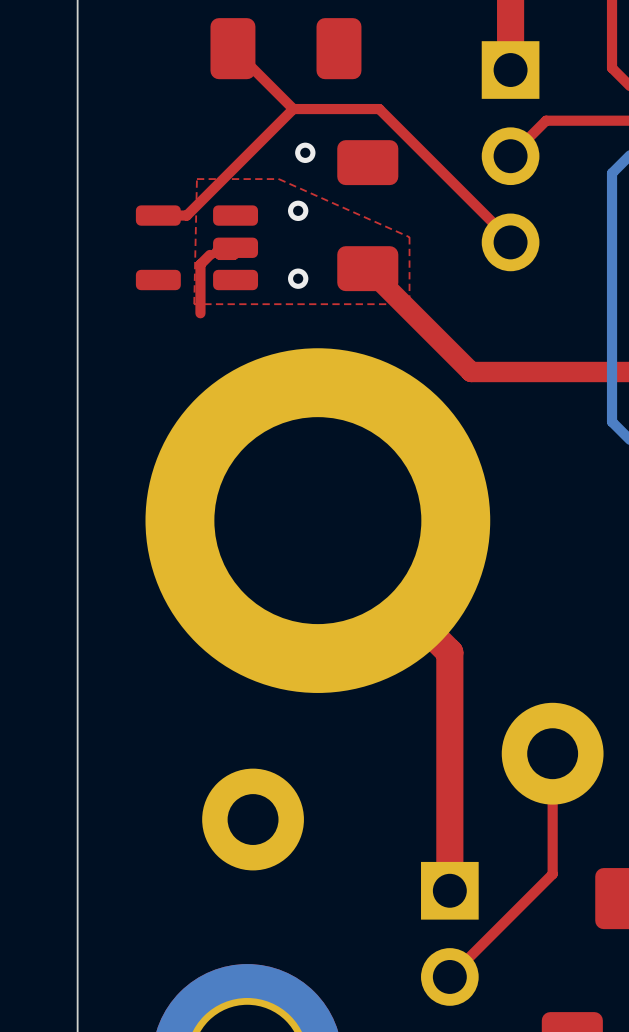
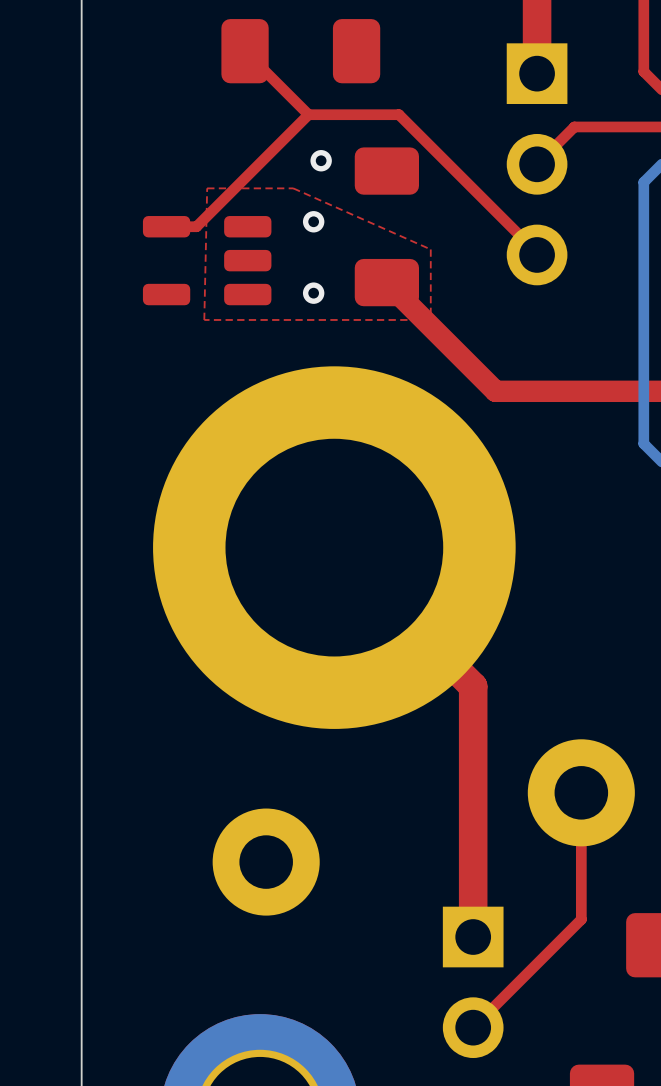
top track: (235, 247) (237, 251) (233, 254) (220, 254) (216, 251) (213, 254) (209, 254) (200, 264) (200, 313) -> none

